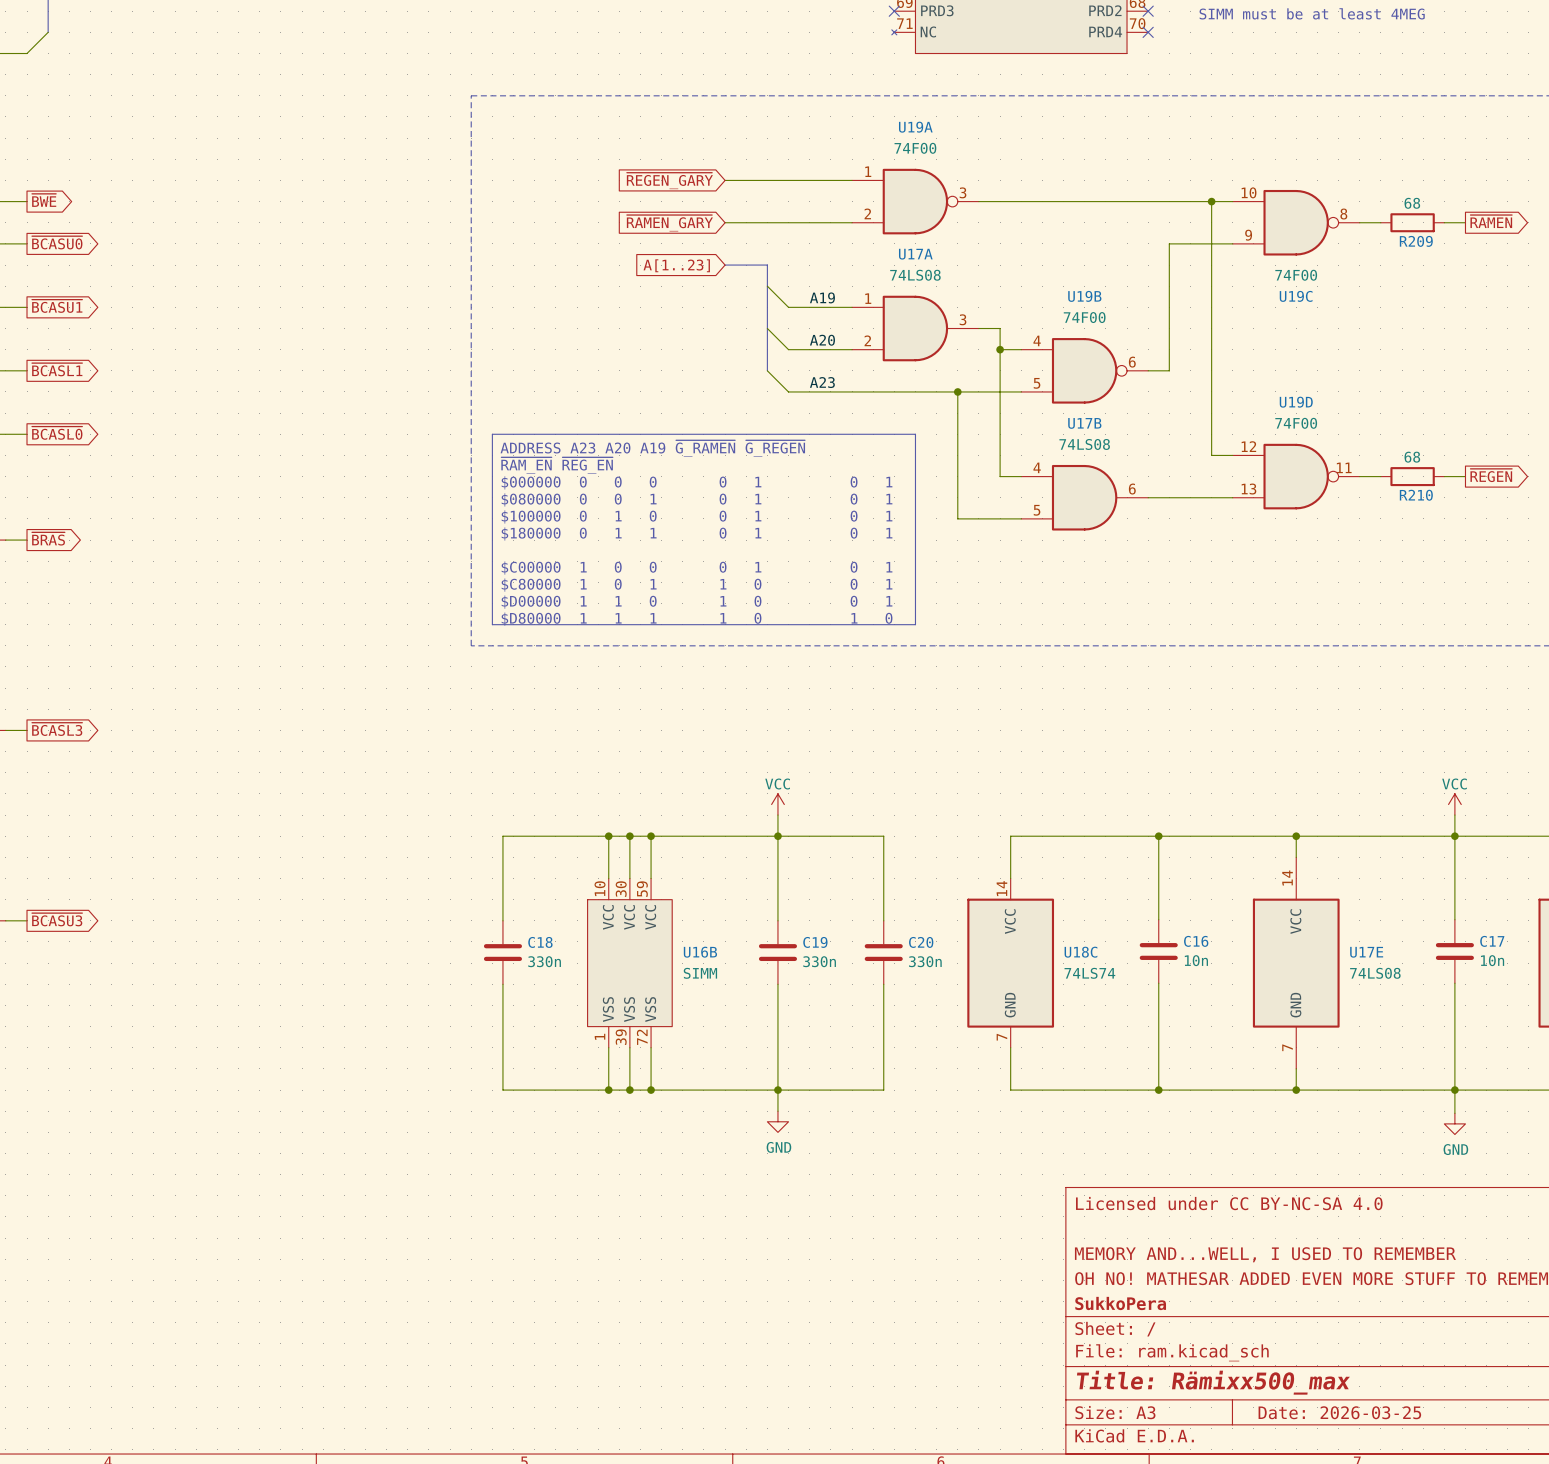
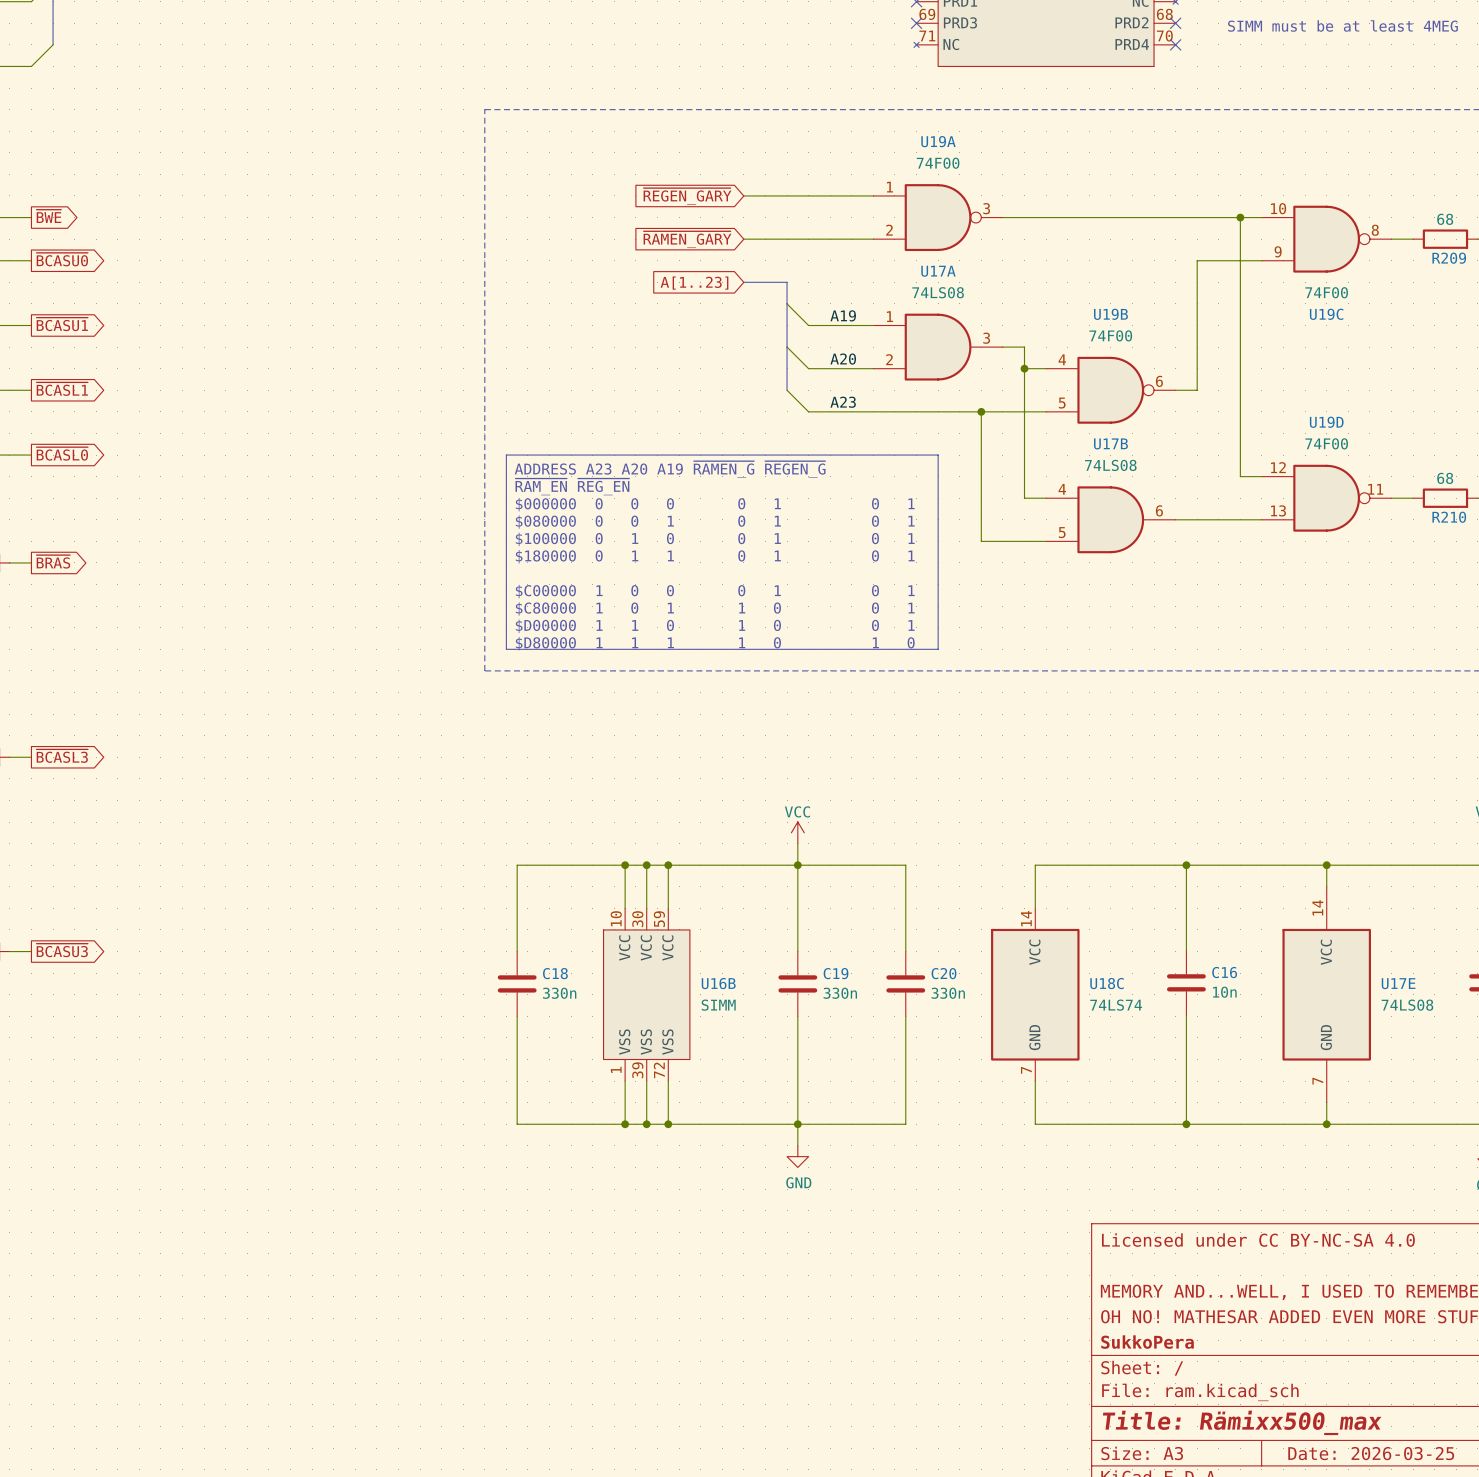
text: ADDRESS A23 A20 A19 ~{G_RAMEN} ~{G_REGEN} (652, 448) -> ADDRESS A23 A20 A19 ~{RAMEN_G} ~{REGEN_G} (670, 469)

